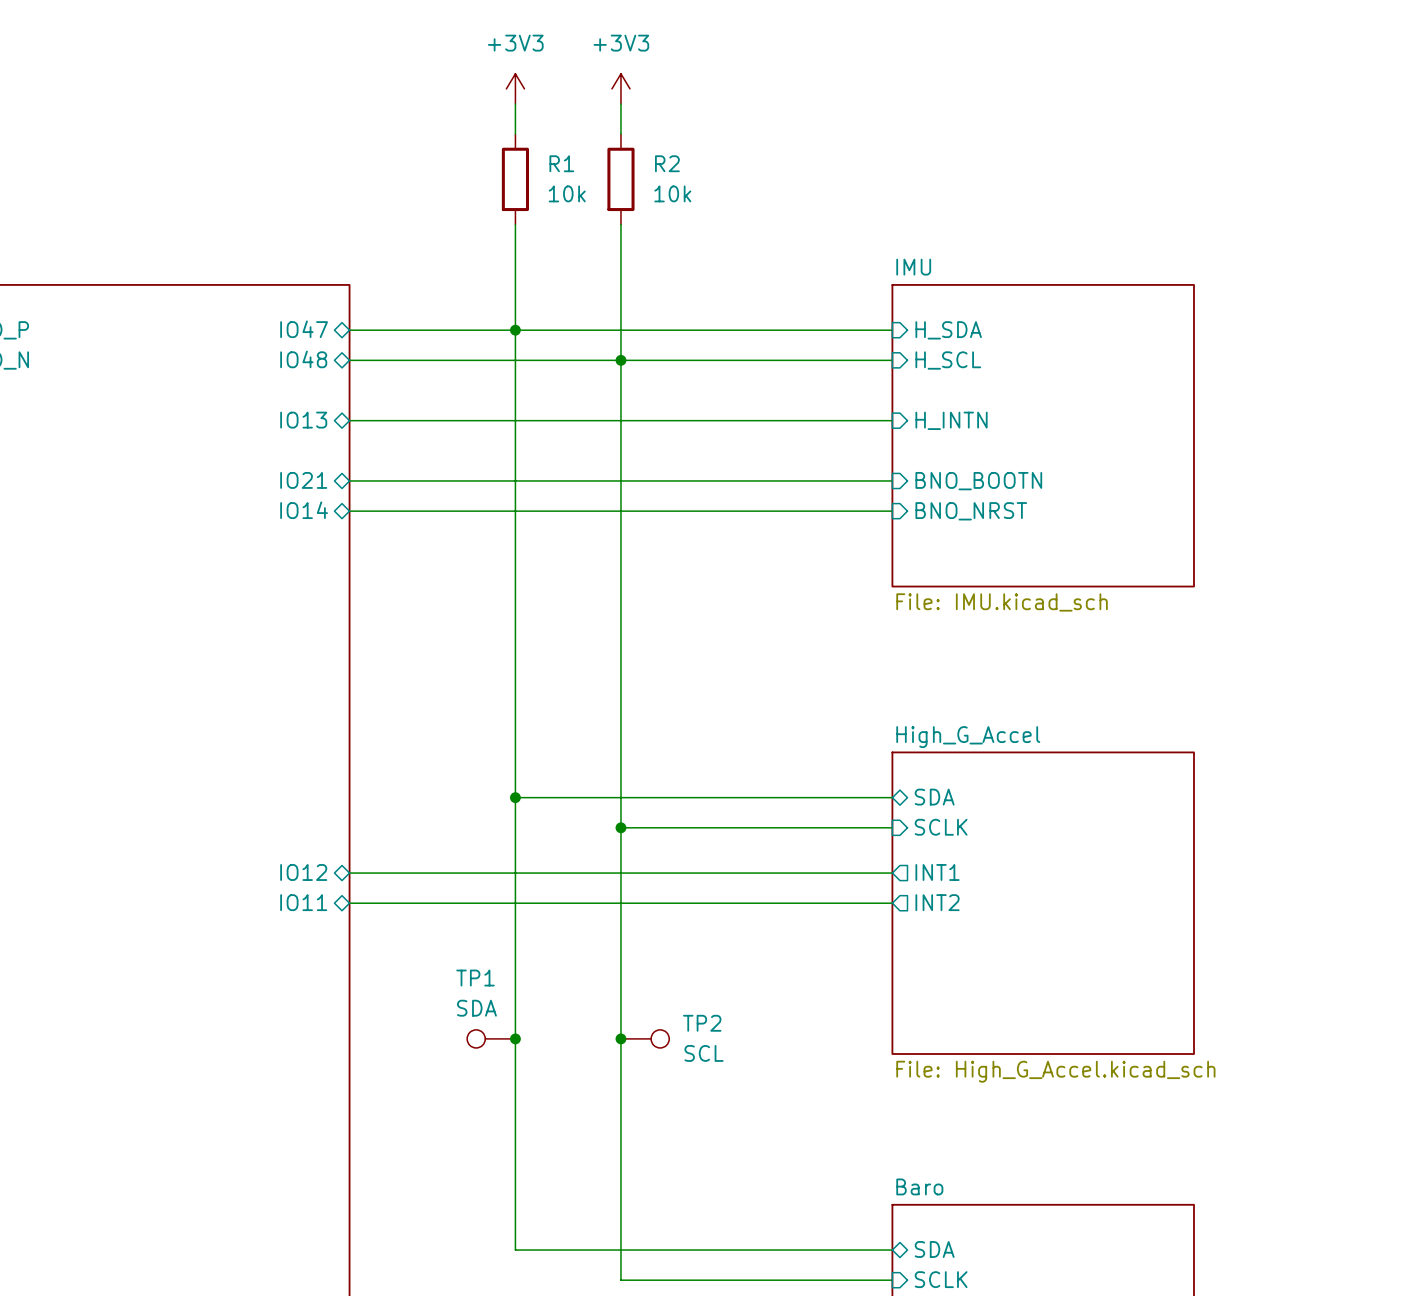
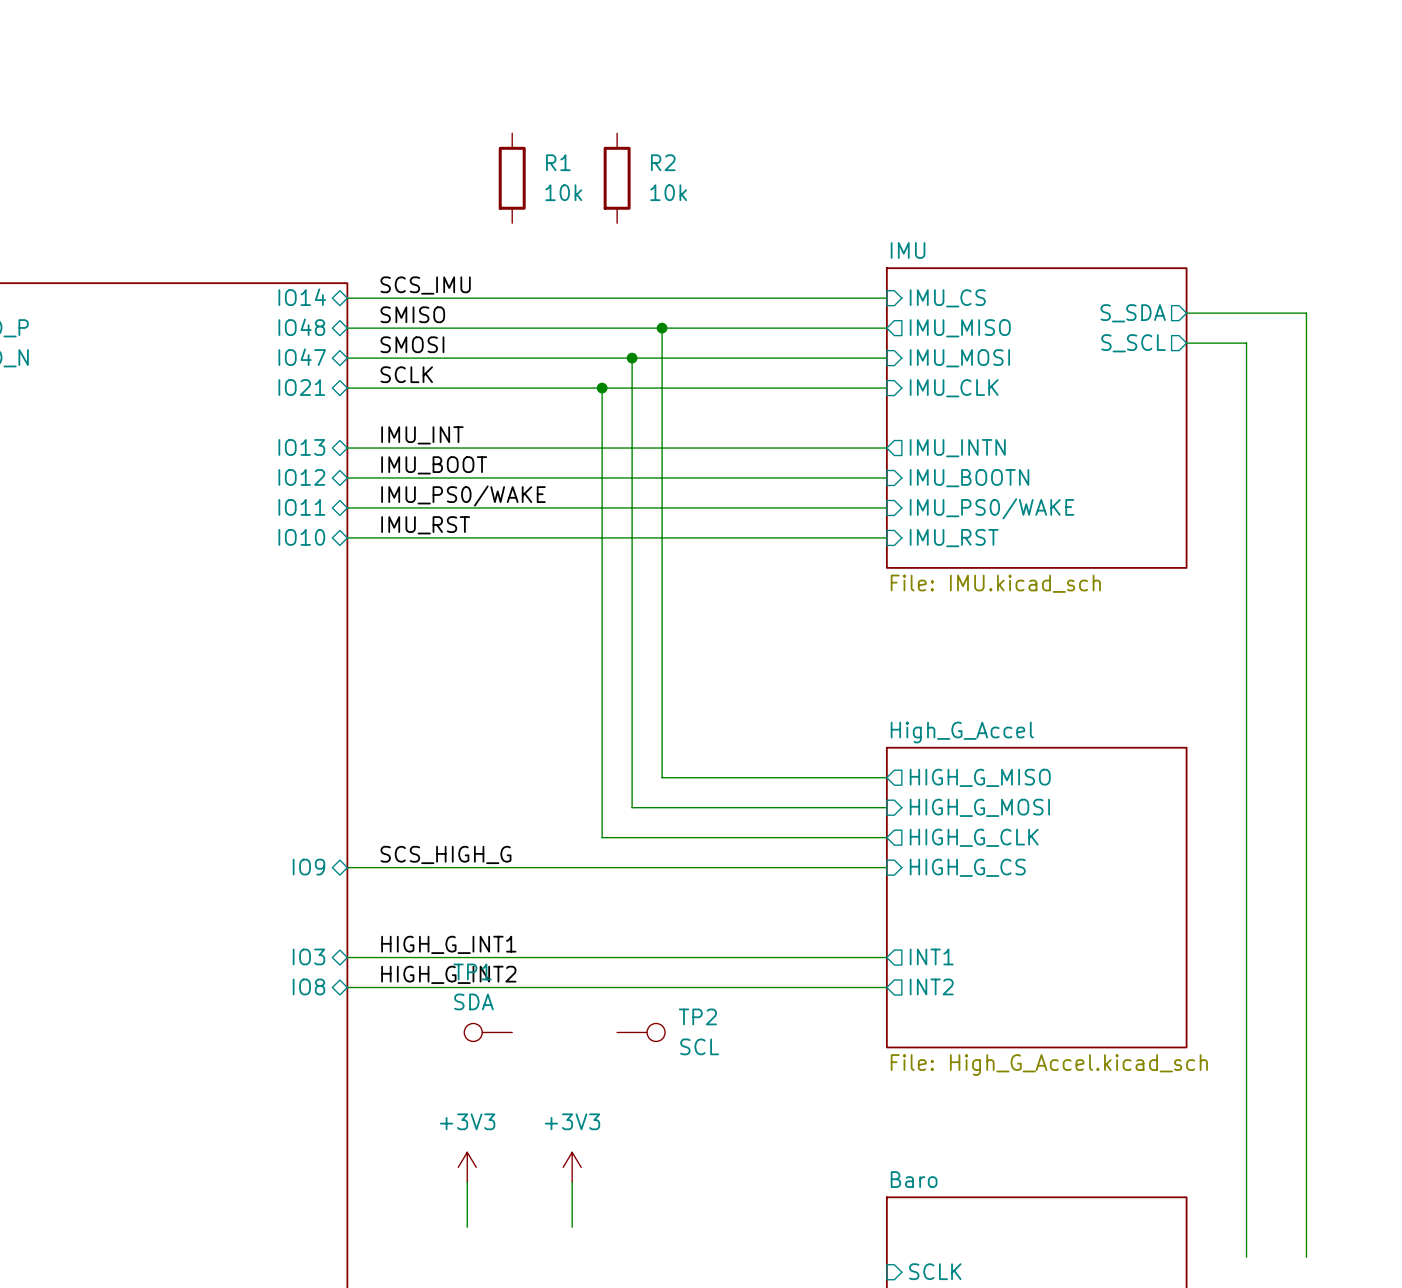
power symbol: +3V3 (515, 88) -> none
power symbol: +3V3 (620, 88) -> none
wire: (515, 103) (515, 134) -> none
wire: (620, 103) (620, 134) -> none
wire: (515, 224) (515, 1250) (892, 1250) -> none
wire: (620, 224) (620, 1280) (892, 1280) -> none
label: none -> SCS_IMU (425, 285)
sheet pin: none -> IO14 (302, 297)
sheet pin: none -> IMU_CS (947, 298)
sheet pin: none -> S_SDA (1133, 313)
wire: none -> (1186, 313) (1306, 313) (1306, 1257)
label: none -> SMISO (412, 314)
sheet pin: IO47 (304, 329) -> IO48 (301, 327)
junction: (515, 330) -> none
wire: none -> (662, 328) (662, 777) (886, 777)
junction: none -> (662, 328)
sheet pin shape: input (948, 330) -> output (960, 328)
sheet pin: H_SDA (948, 330) -> IMU_MISO (960, 328)
sheet pin: none -> S_SCL (1133, 343)
wire: none -> (1186, 343) (1246, 343) (1246, 1257)
label: none -> SMOSI (412, 344)
sheet pin: IO48 (303, 359) -> IO47 (302, 357)
junction position: (620, 360) -> (632, 358)
wire: none -> (632, 358) (632, 807) (886, 807)
sheet pin: H_SCL (948, 360) -> IMU_MOSI (959, 358)
label: none -> SCLK (406, 374)
sheet pin: none -> IO21 (301, 387)
wire: none -> (347, 388) (886, 388)
wire: none -> (602, 388) (602, 837) (886, 837)
junction: none -> (602, 388)
sheet pin: none -> IMU_CLK (954, 388)
sheet pin position: IO13 (303, 420) -> IO13 (301, 447)
wire: (349, 420) (892, 420) -> (347, 298) (886, 298)
sheet pin shape: input (951, 420) -> output (957, 448)
sheet pin: H_INTN (951, 420) -> IMU_INTN (957, 448)
sheet IMU position: (1043, 435) -> (1036, 418)
label: none -> IMU_INT (422, 435)
wire: none -> (347, 448) (886, 448)
label: none -> IMU_BOOT (434, 465)
sheet pin: IO21 (303, 480) -> IO12 (301, 477)
sheet pin: BNO_BOOTN (978, 481) -> IMU_BOOTN (969, 478)
label: none -> IMU_PS0/WAKE (463, 496)
sheet pin: IO14 (304, 510) -> IO11 (301, 507)
sheet pin: BNO_NRST (971, 511) -> IMU_PS0/WAKE (992, 508)
label: none -> IMU_RST (425, 525)
sheet pin: none -> IO10 (301, 537)
wire: none -> (347, 537) (886, 537)
sheet pin: none -> IMU_RST (954, 538)
sheet pin: none -> HIGH_G_MISO (980, 777)
wire: (515, 797) (892, 797) -> none
junction: (515, 797) -> none
sheet pin: SDA (934, 797) -> none
sheet pin: none -> HIGH_G_MOSI (979, 807)
wire: (620, 827) (892, 827) -> none
junction: (620, 827) -> none
sheet pin: SCLK (941, 827) -> none
sheet pin: none -> HIGH_G_CLK (974, 837)
label: none -> SCS_HIGH_G (445, 854)
sheet pin: IO12 (303, 872) -> IO9 (308, 867)
sheet pin shape: output (937, 872) -> input (967, 867)
sheet pin: INT1 (937, 872) -> HIGH_G_CS (967, 867)
sheet pin: IO11 (303, 902) -> none
sheet pin position: INT2 (937, 902) -> INT2 (931, 986)
wire: (349, 903) (892, 903) -> (347, 957) (886, 957)
label: none -> HIGH_G_INT1 (448, 944)
sheet pin: none -> IO3 (308, 956)
sheet pin: none -> INT1 (931, 956)
label: none -> HIGH_G_INT2 (448, 974)
sheet pin: none -> IO8 (308, 986)
wire: none -> (347, 987) (886, 987)
junction: (515, 1038) -> none
junction: (620, 1038) -> none
power symbol: none -> +3V3 (467, 1167)
power symbol: none -> +3V3 (572, 1167)
wire: none -> (467, 1182) (467, 1227)
wire: none -> (572, 1182) (572, 1227)
sheet pin: SDA (934, 1249) -> none

